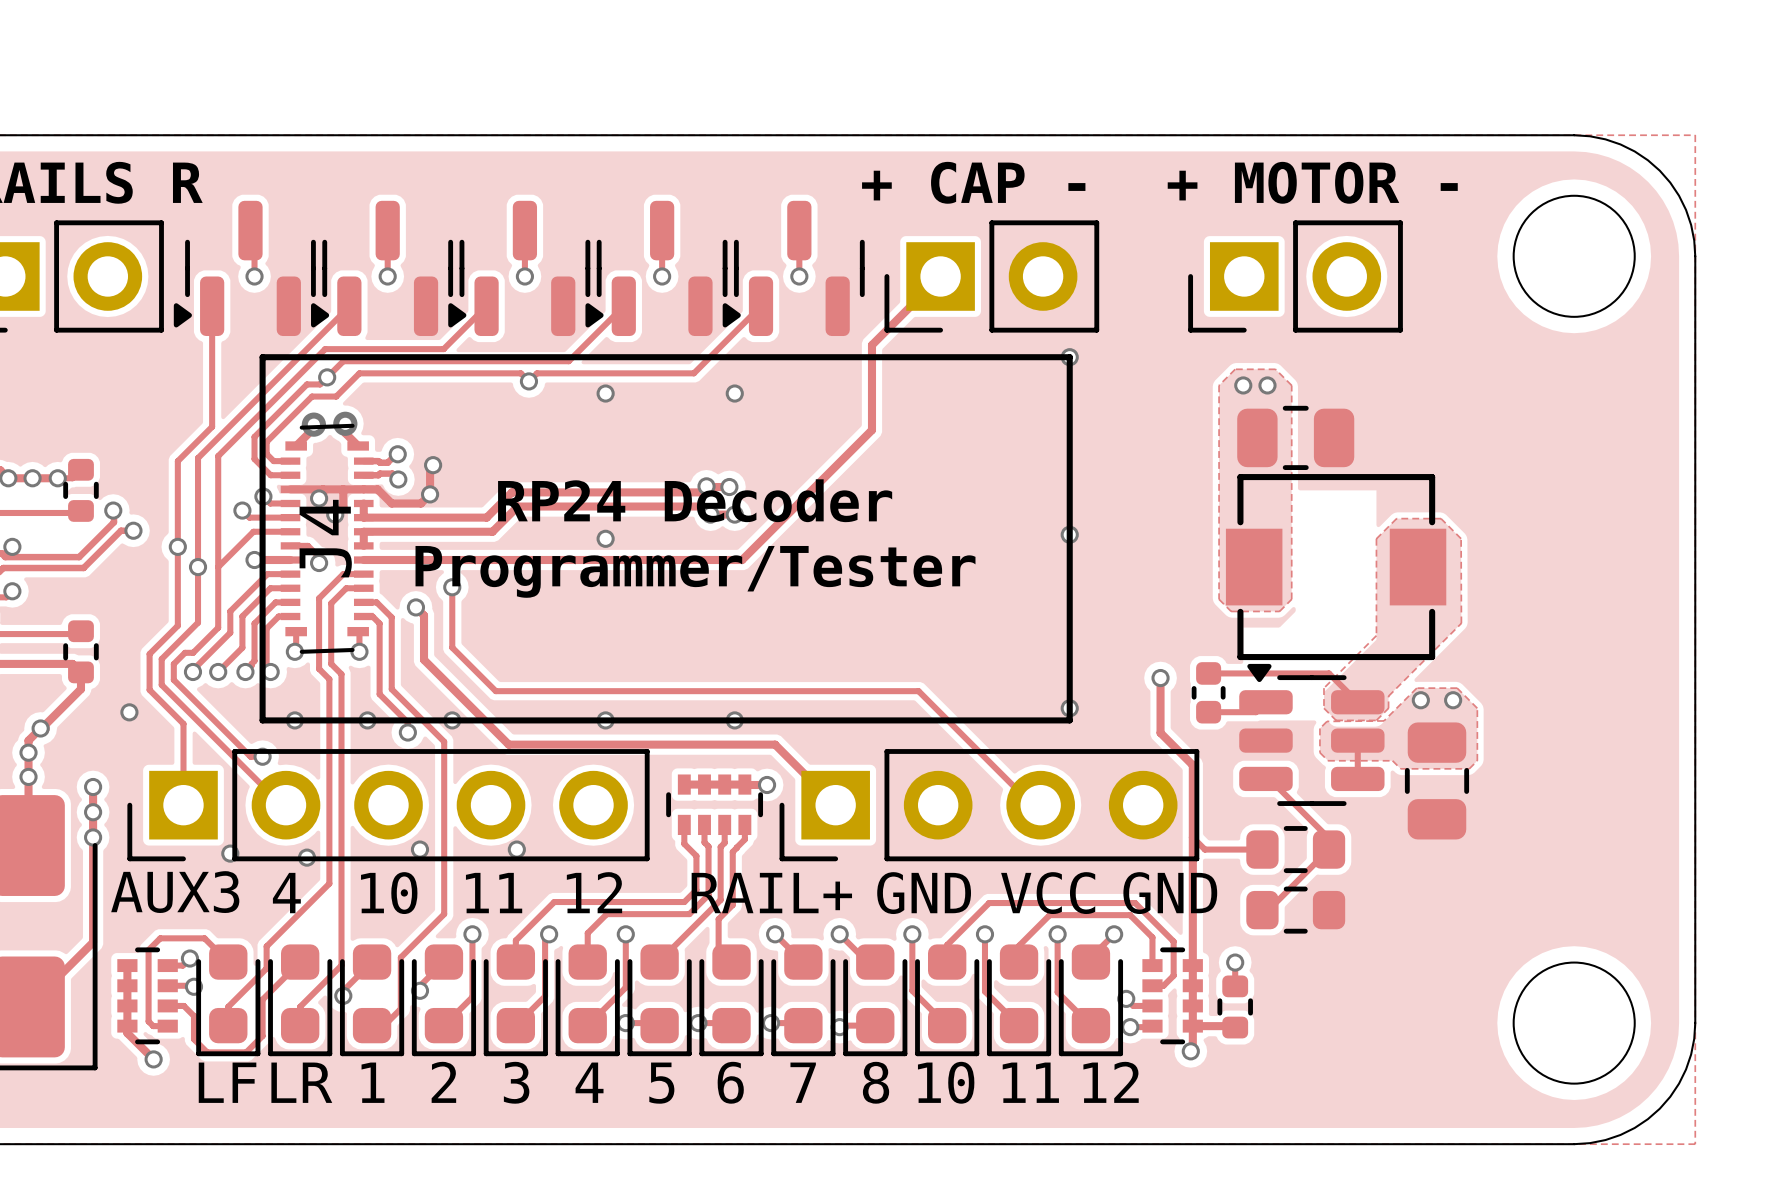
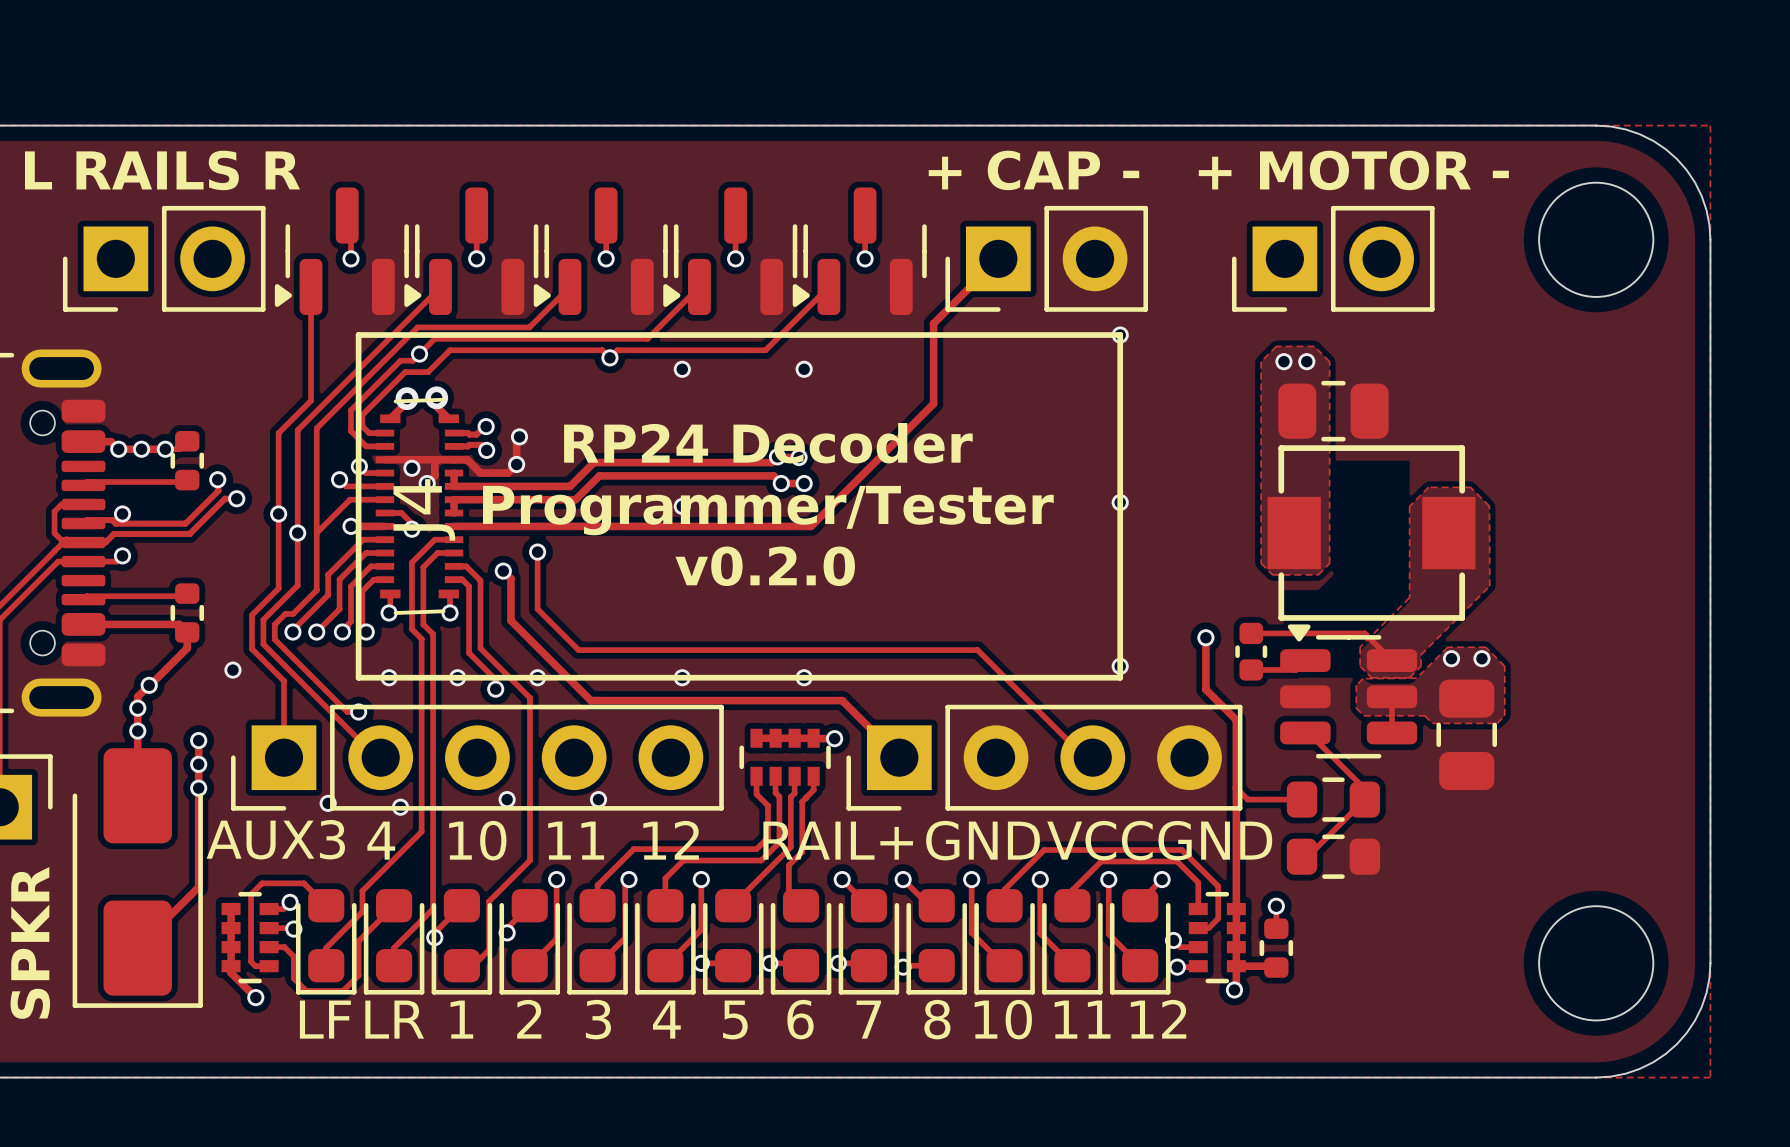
text: none -> RP24 Decoder (768, 443)
text: RP24 Decoder (695, 500) -> Programmer/Tester (768, 510)
text: Programmer/Tester (695, 571) -> v0.2.0 (765, 566)

